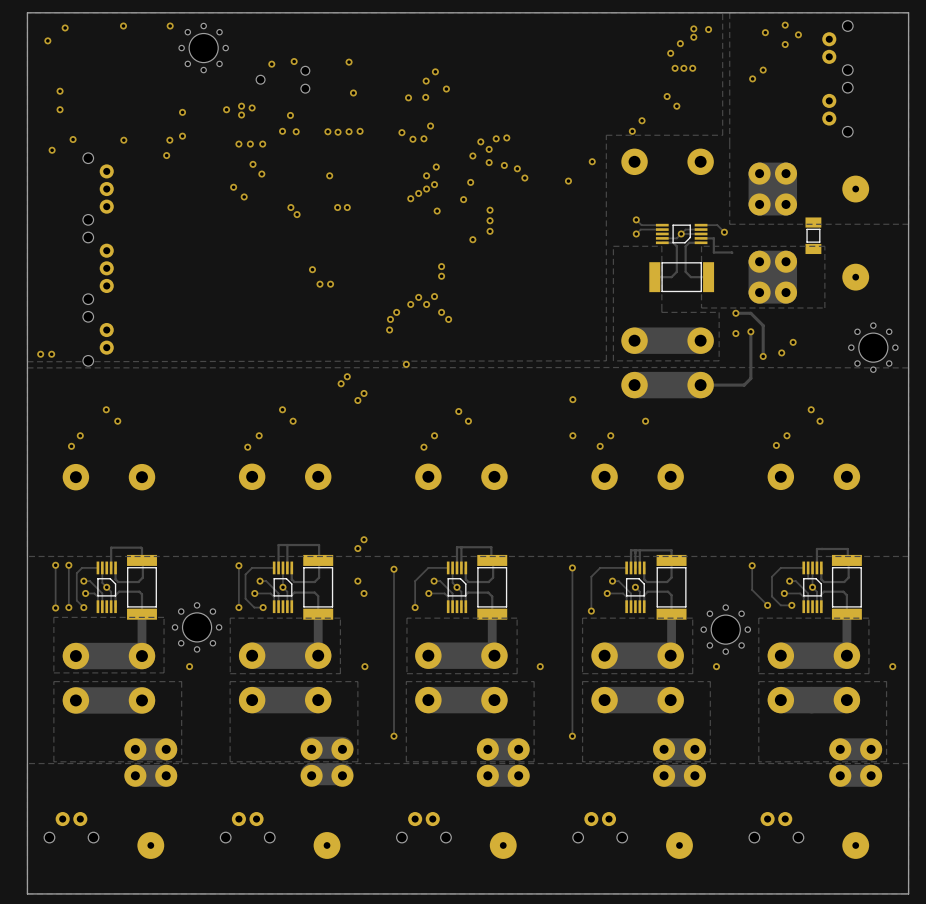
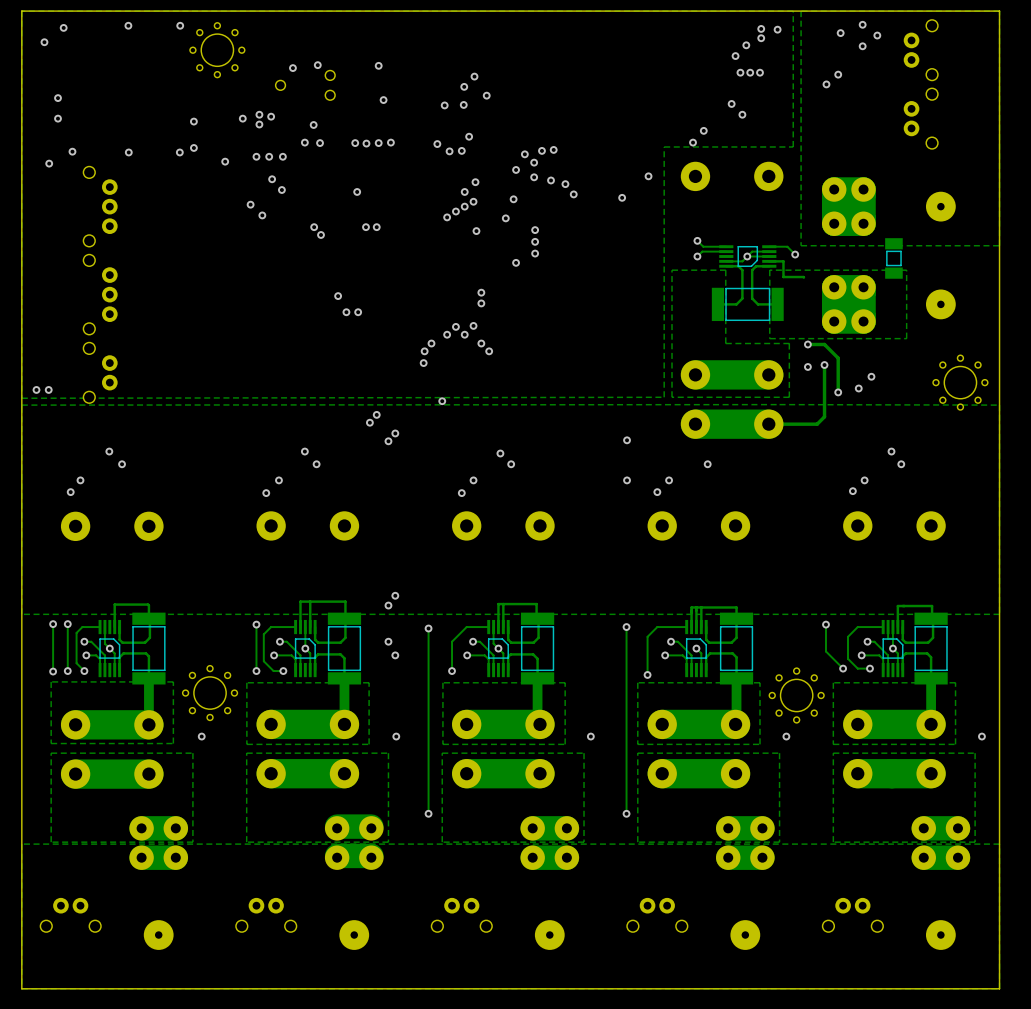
via position: (166, 155) -> (225, 161)

